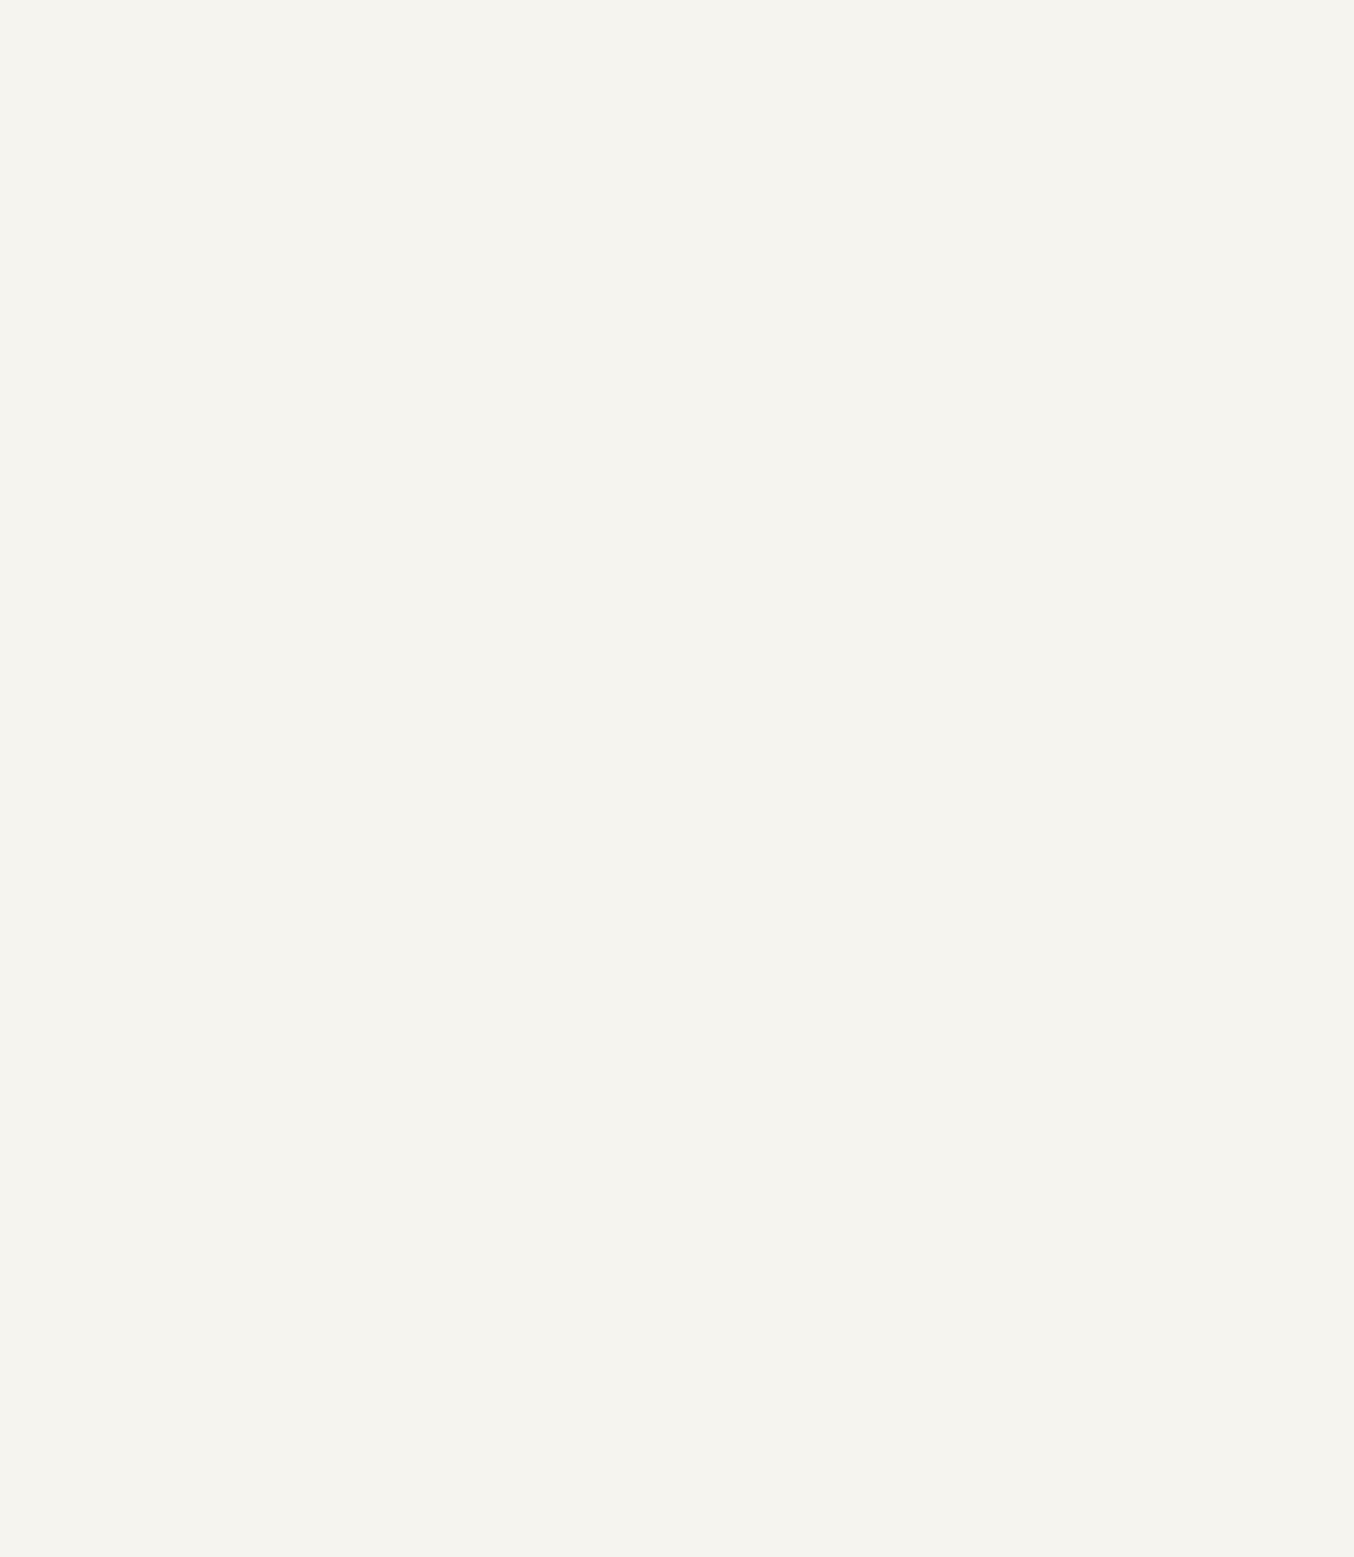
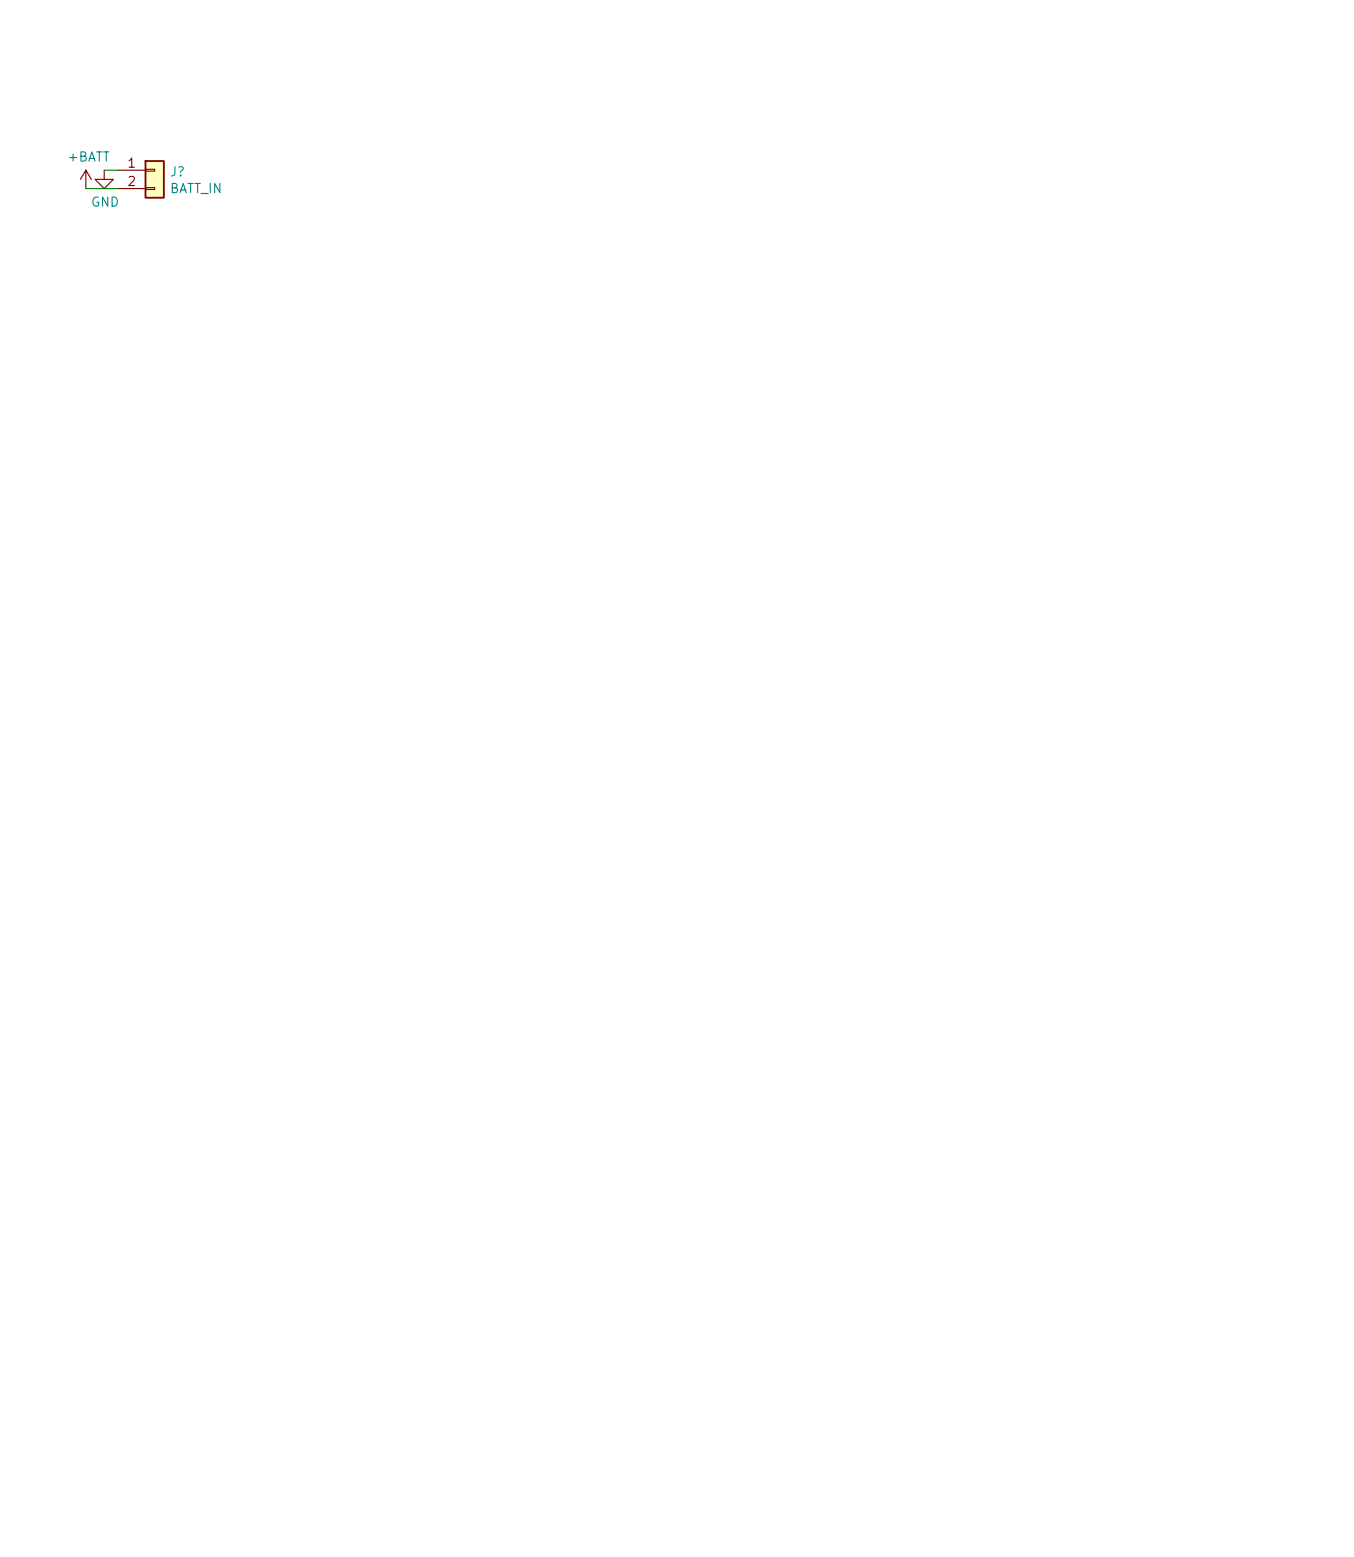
wire: none -> (104, 170) (117, 170)
power symbol: none -> +BATT (85, 179)
power symbol: none -> GND (104, 179)
J?: none -> BATT_IN (141, 179)
wire: none -> (85, 188) (117, 188)

